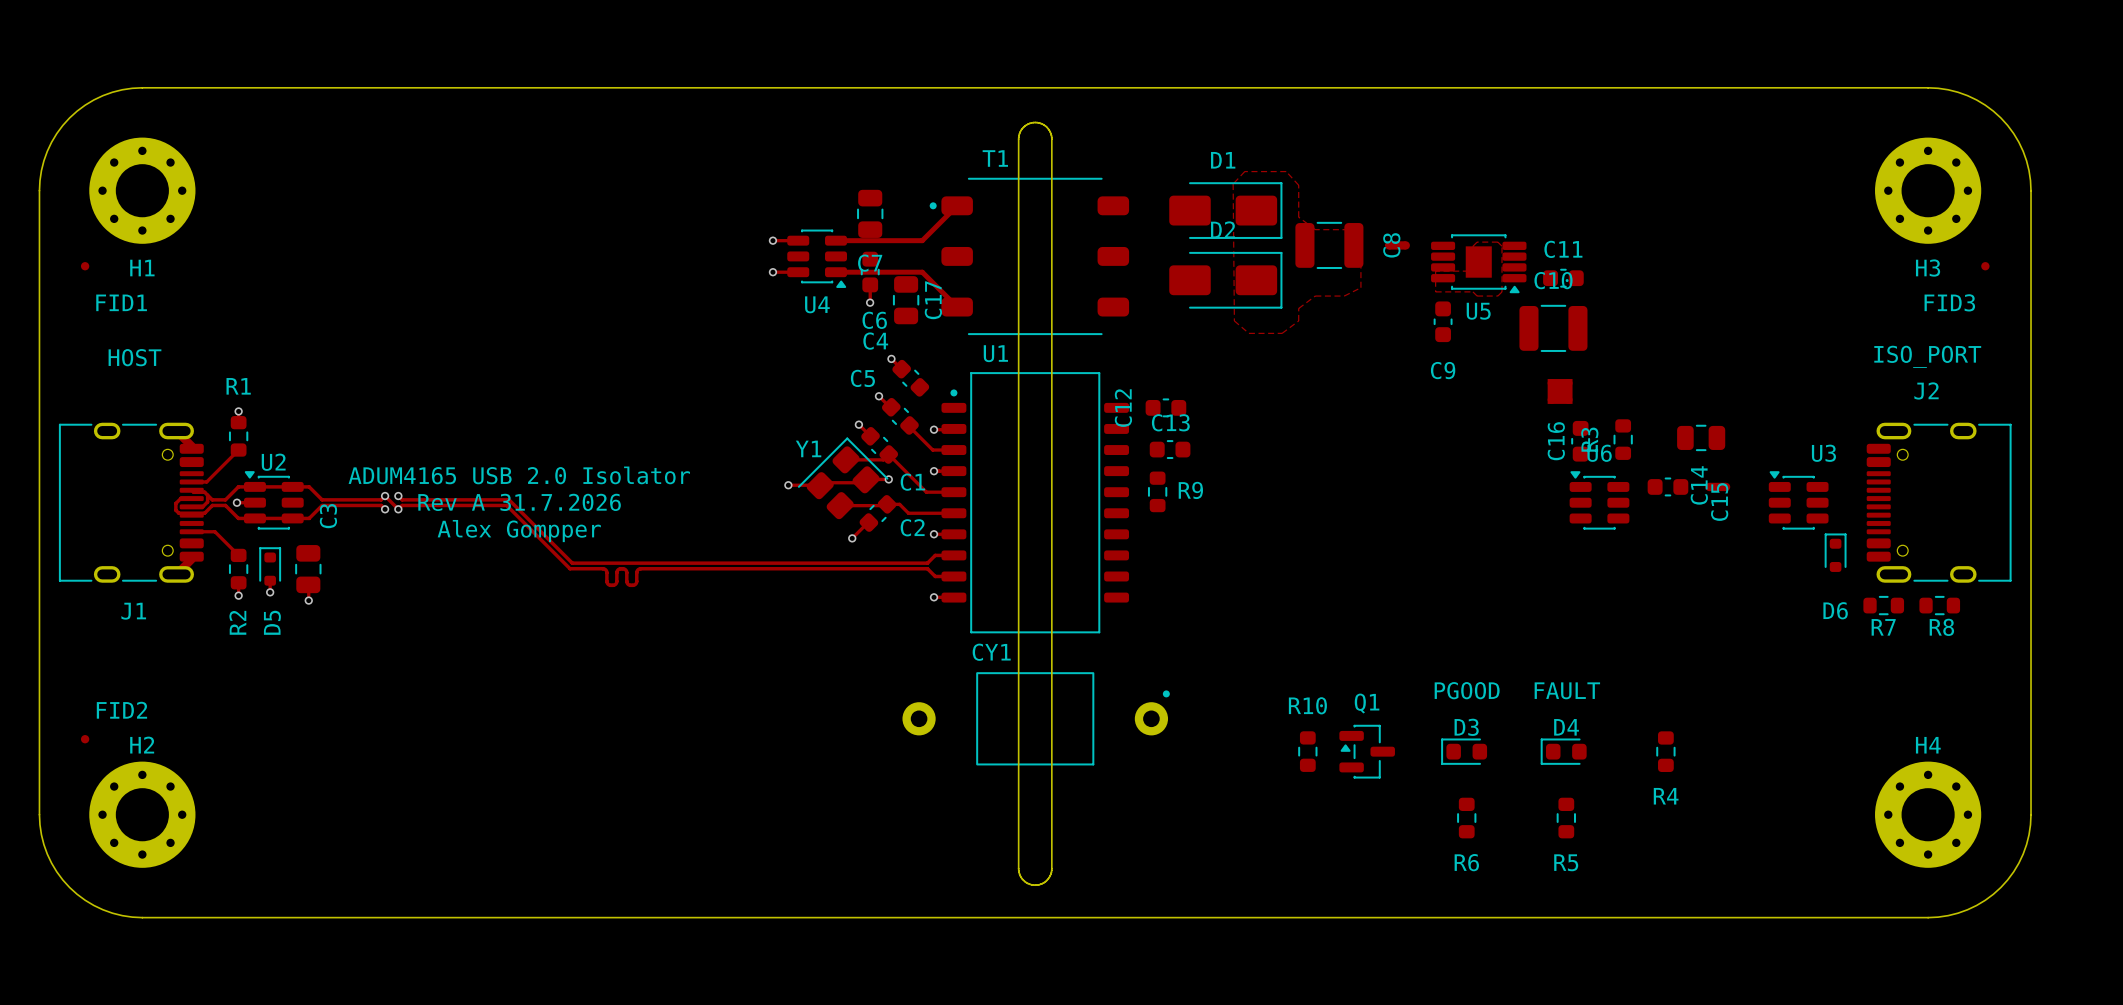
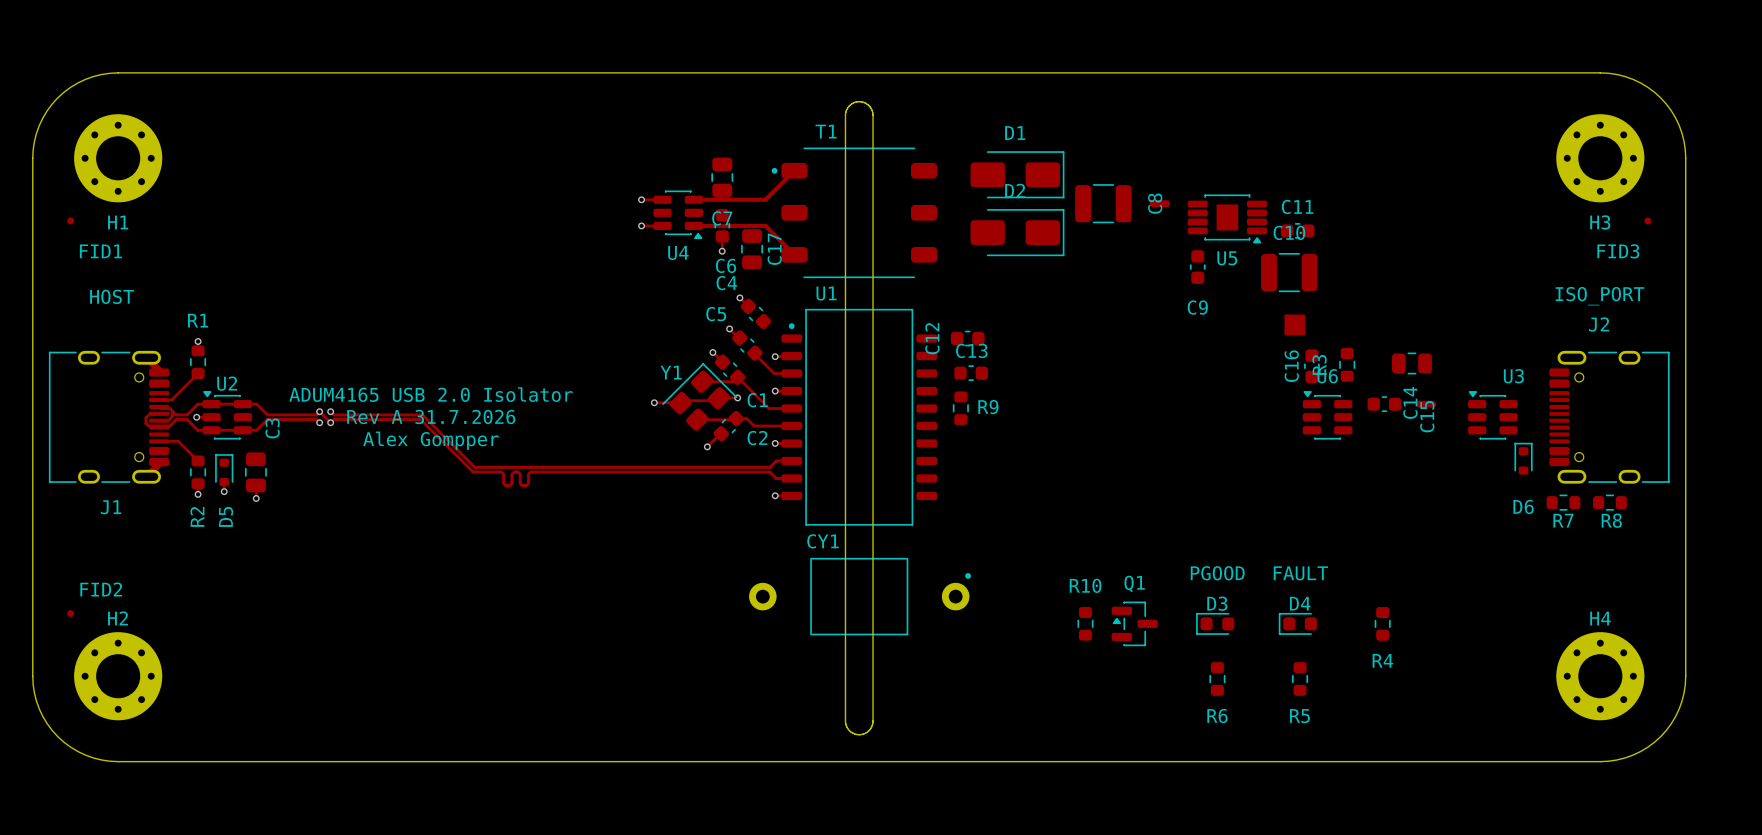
zone outline: (1244, 171) (1286, 171) (1298, 185) (1298, 217) (1315, 229) (1348, 229) (1360, 242) (1360, 287) (1344, 296) (1315, 296) (1298, 308) (1298, 320) (1282, 333) (1248, 333) (1234, 320) (1233, 184) (1244, 171) -> none
zone outline: (1477, 242) (1497, 242) (1502, 246) (1502, 291) (1497, 296) (1477, 296) (1472, 291) (1435, 291) (1435, 271) (1468, 271) (1472, 267) (1472, 246) (1477, 242) -> none

